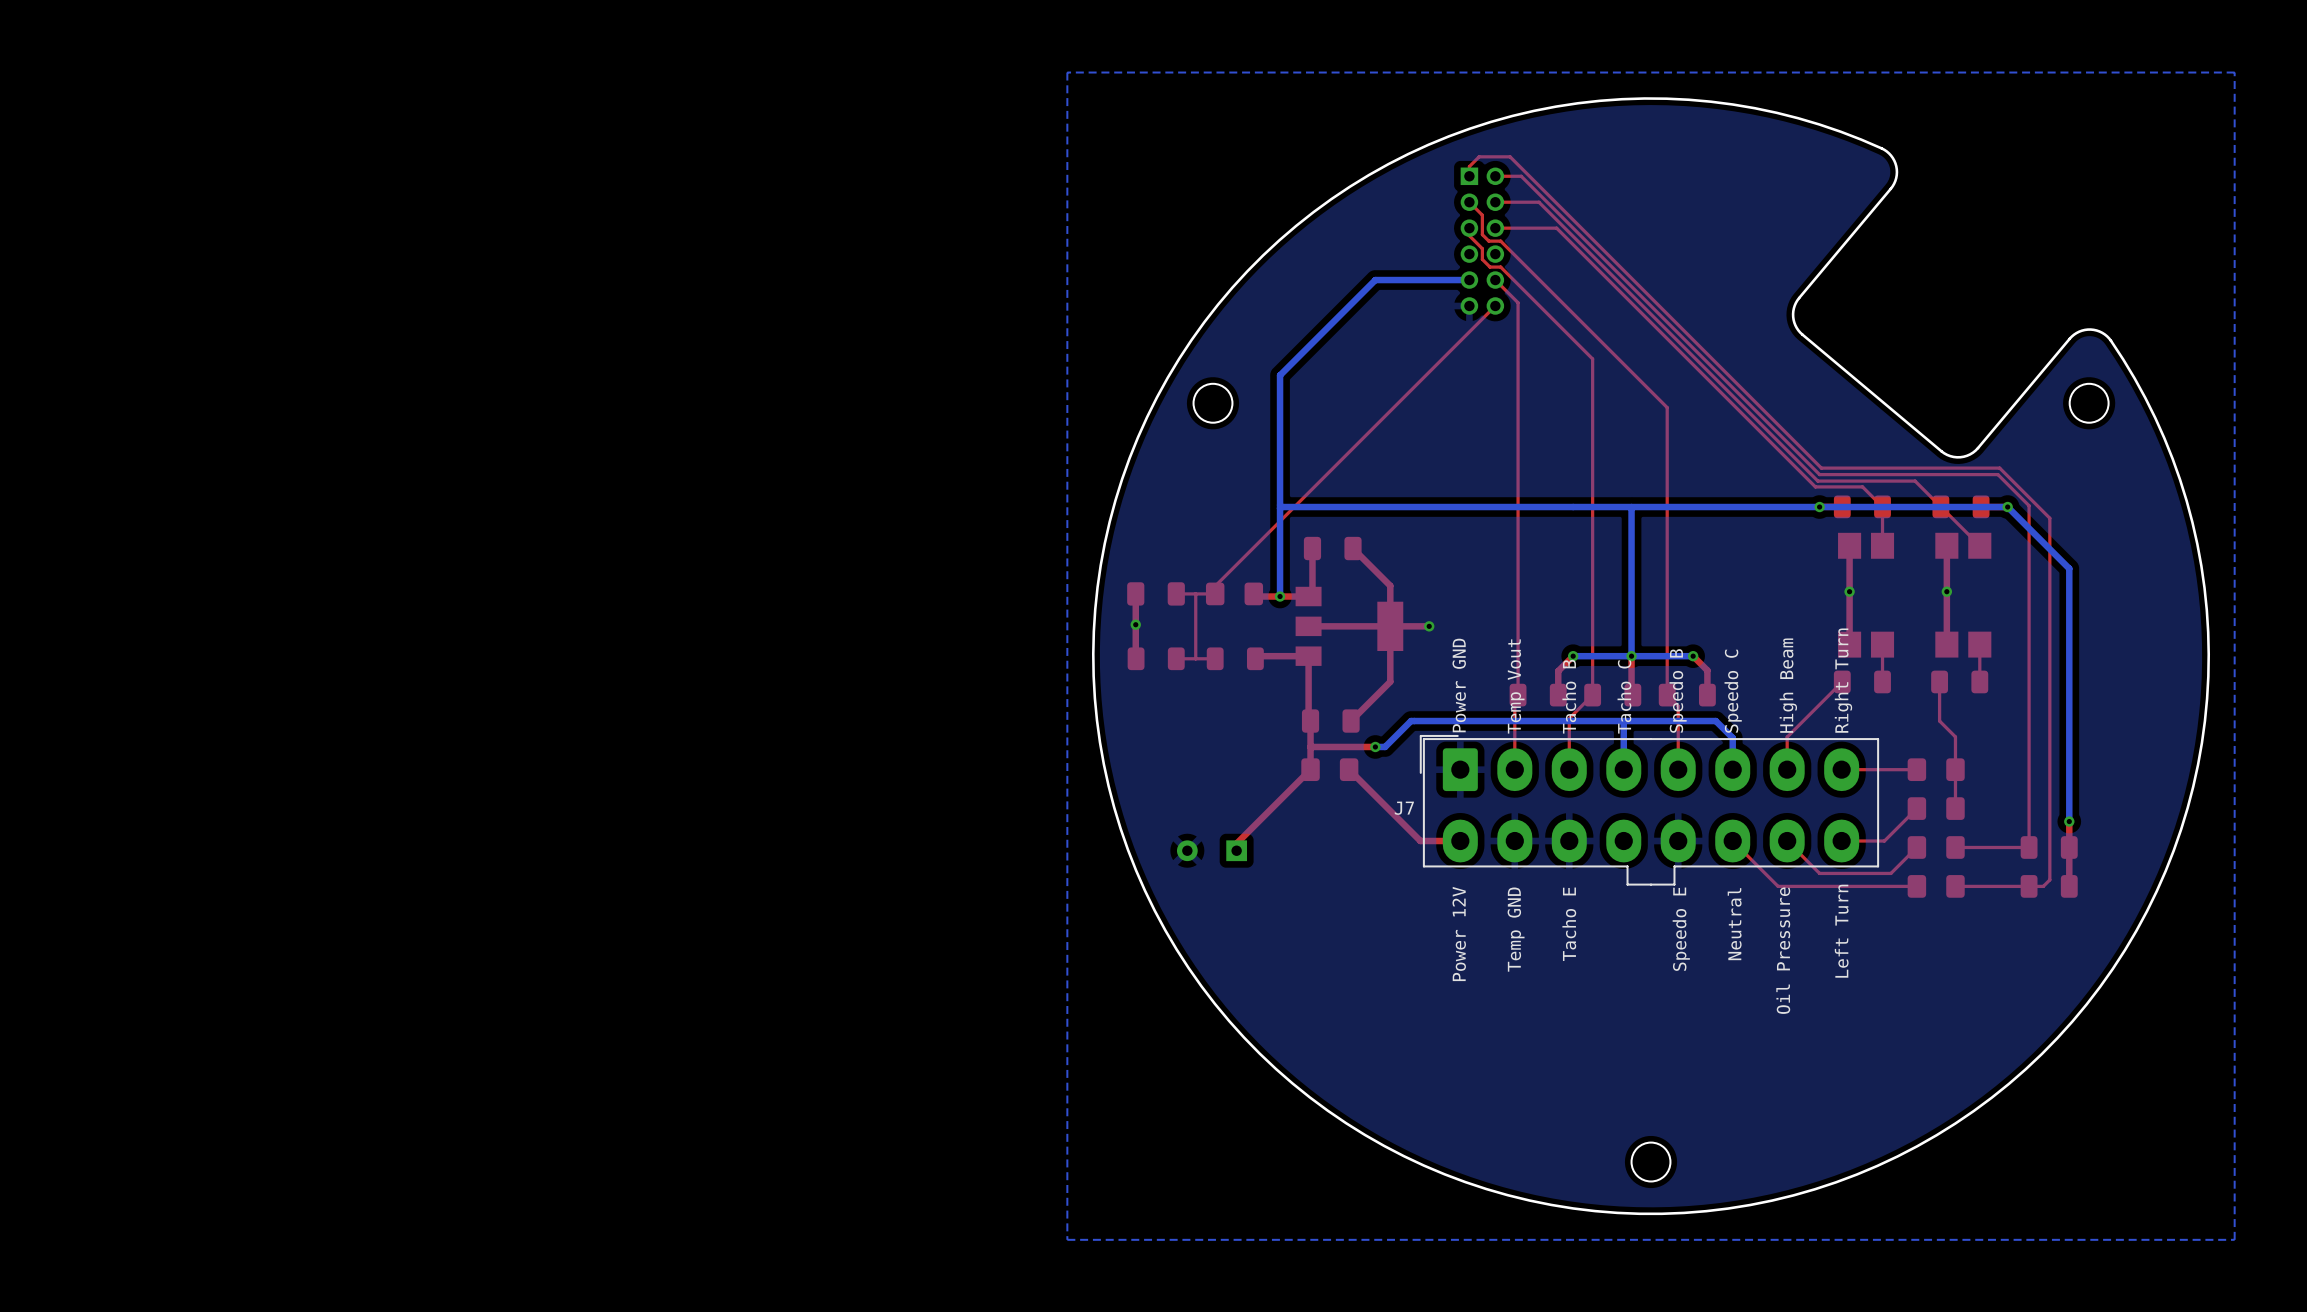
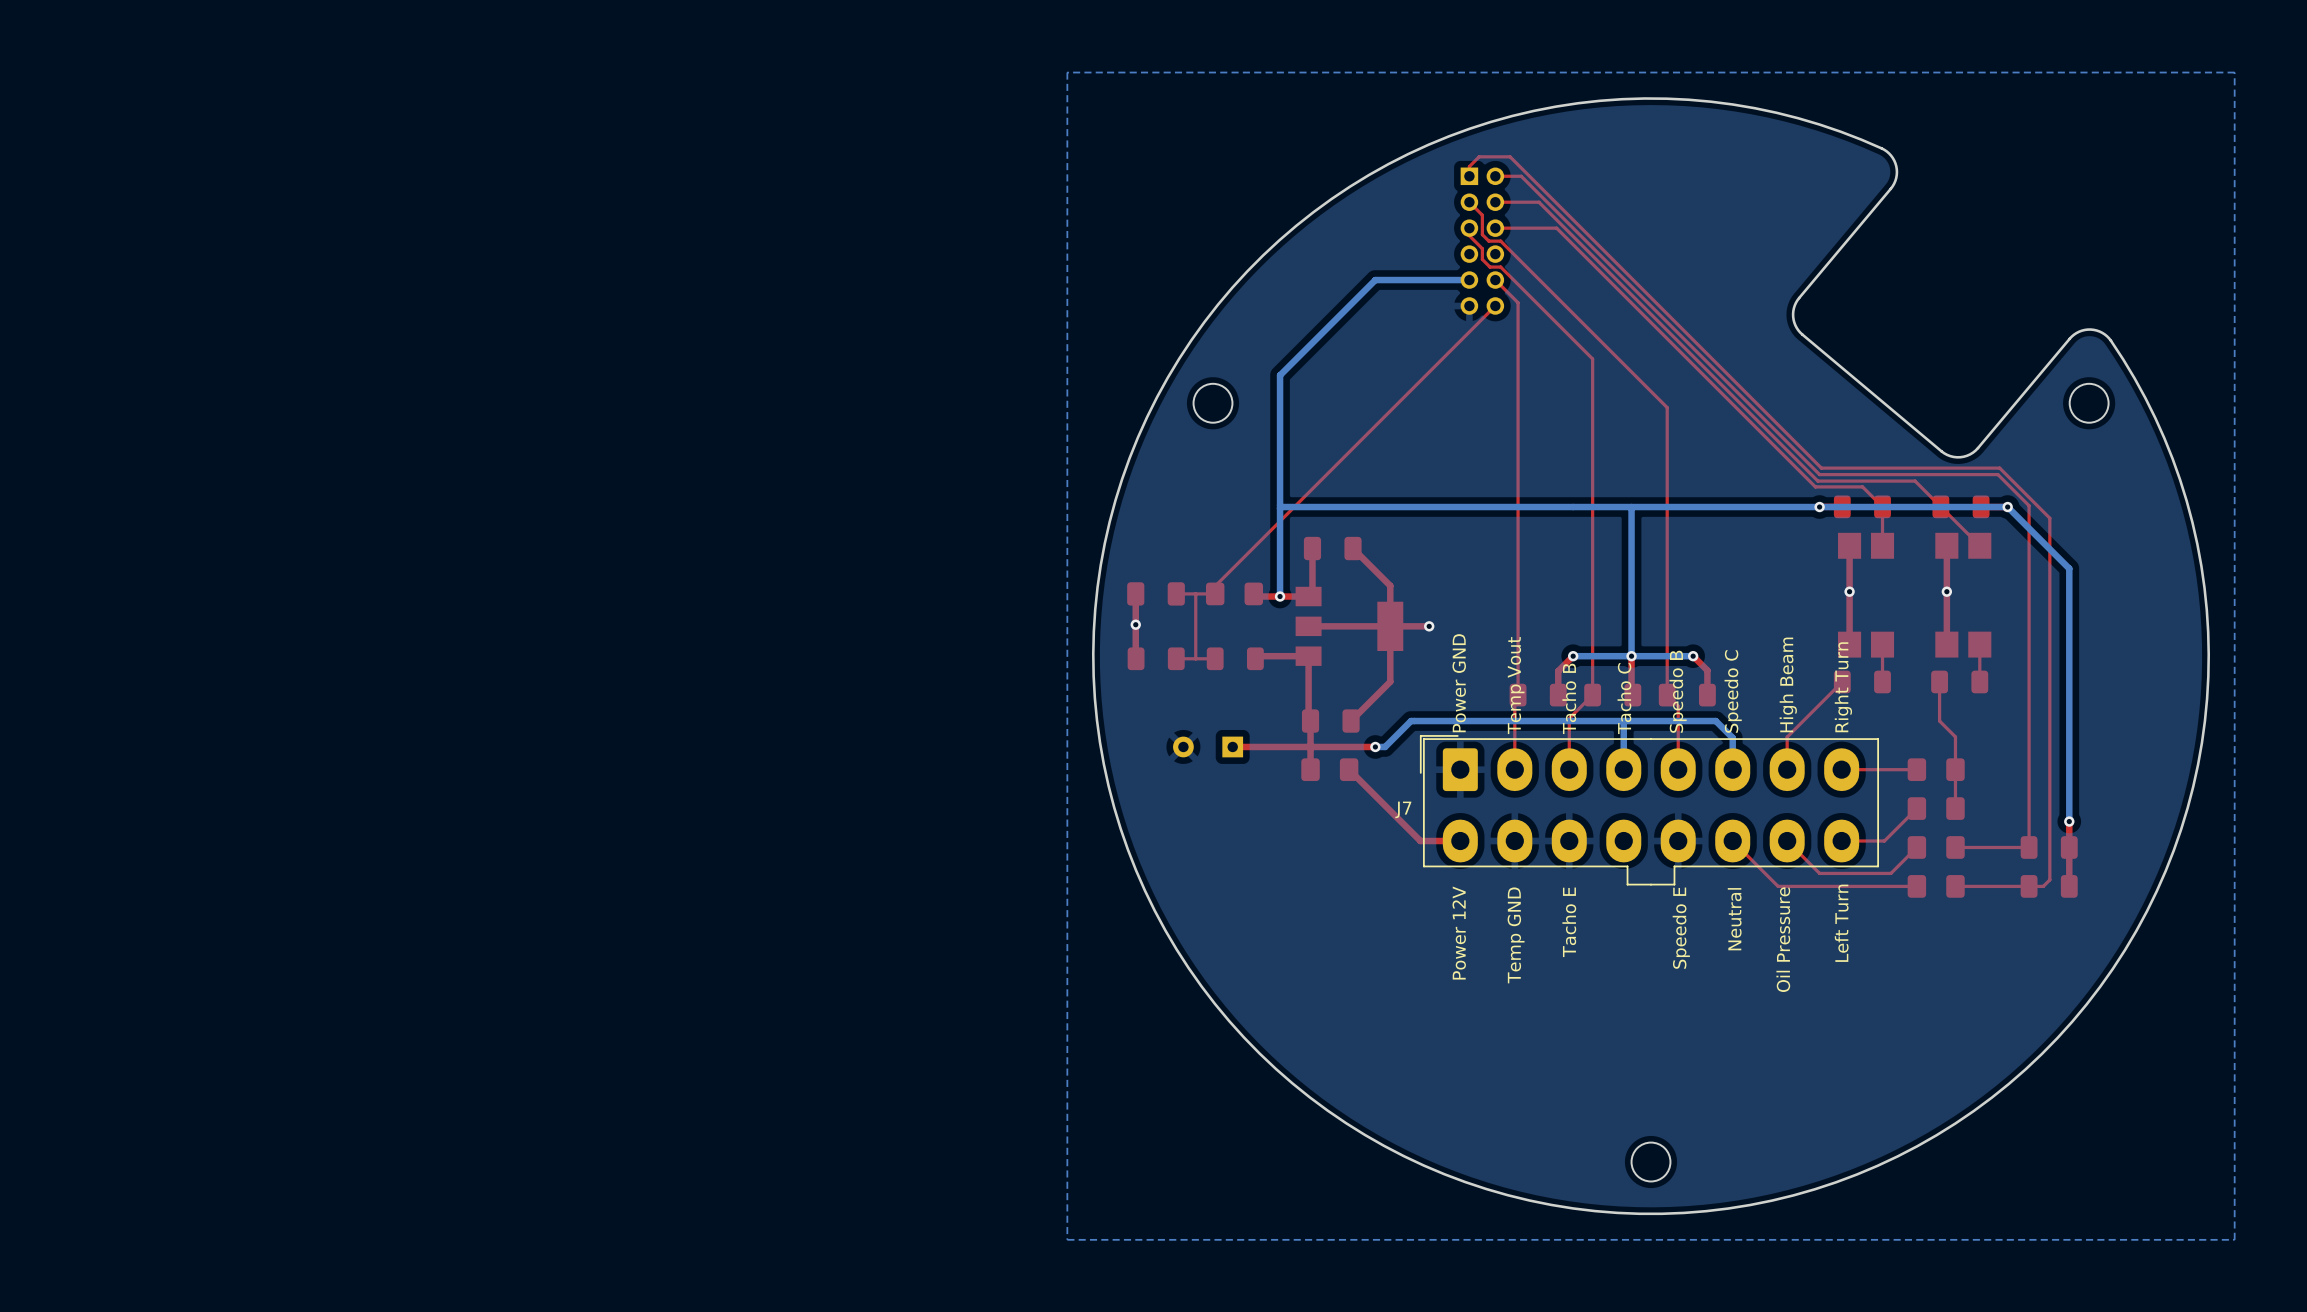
top track: none -> (1310, 746) (1232, 746)
top track: (1310, 769) (1236, 843) (1236, 850) -> none
part position: (1211, 850) -> (1208, 746)

